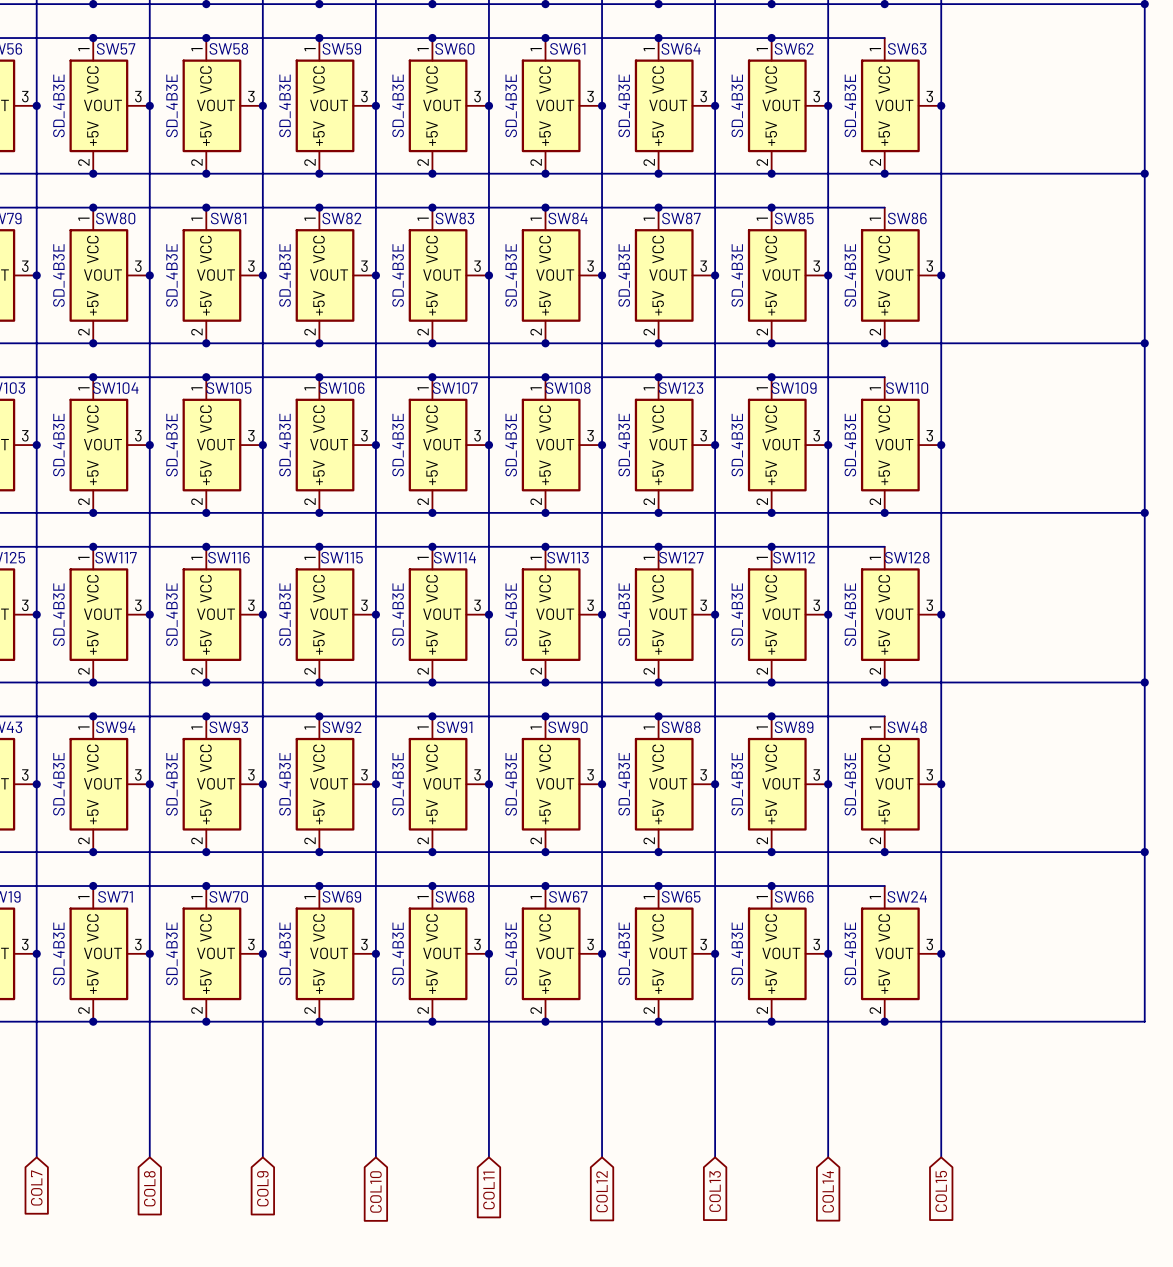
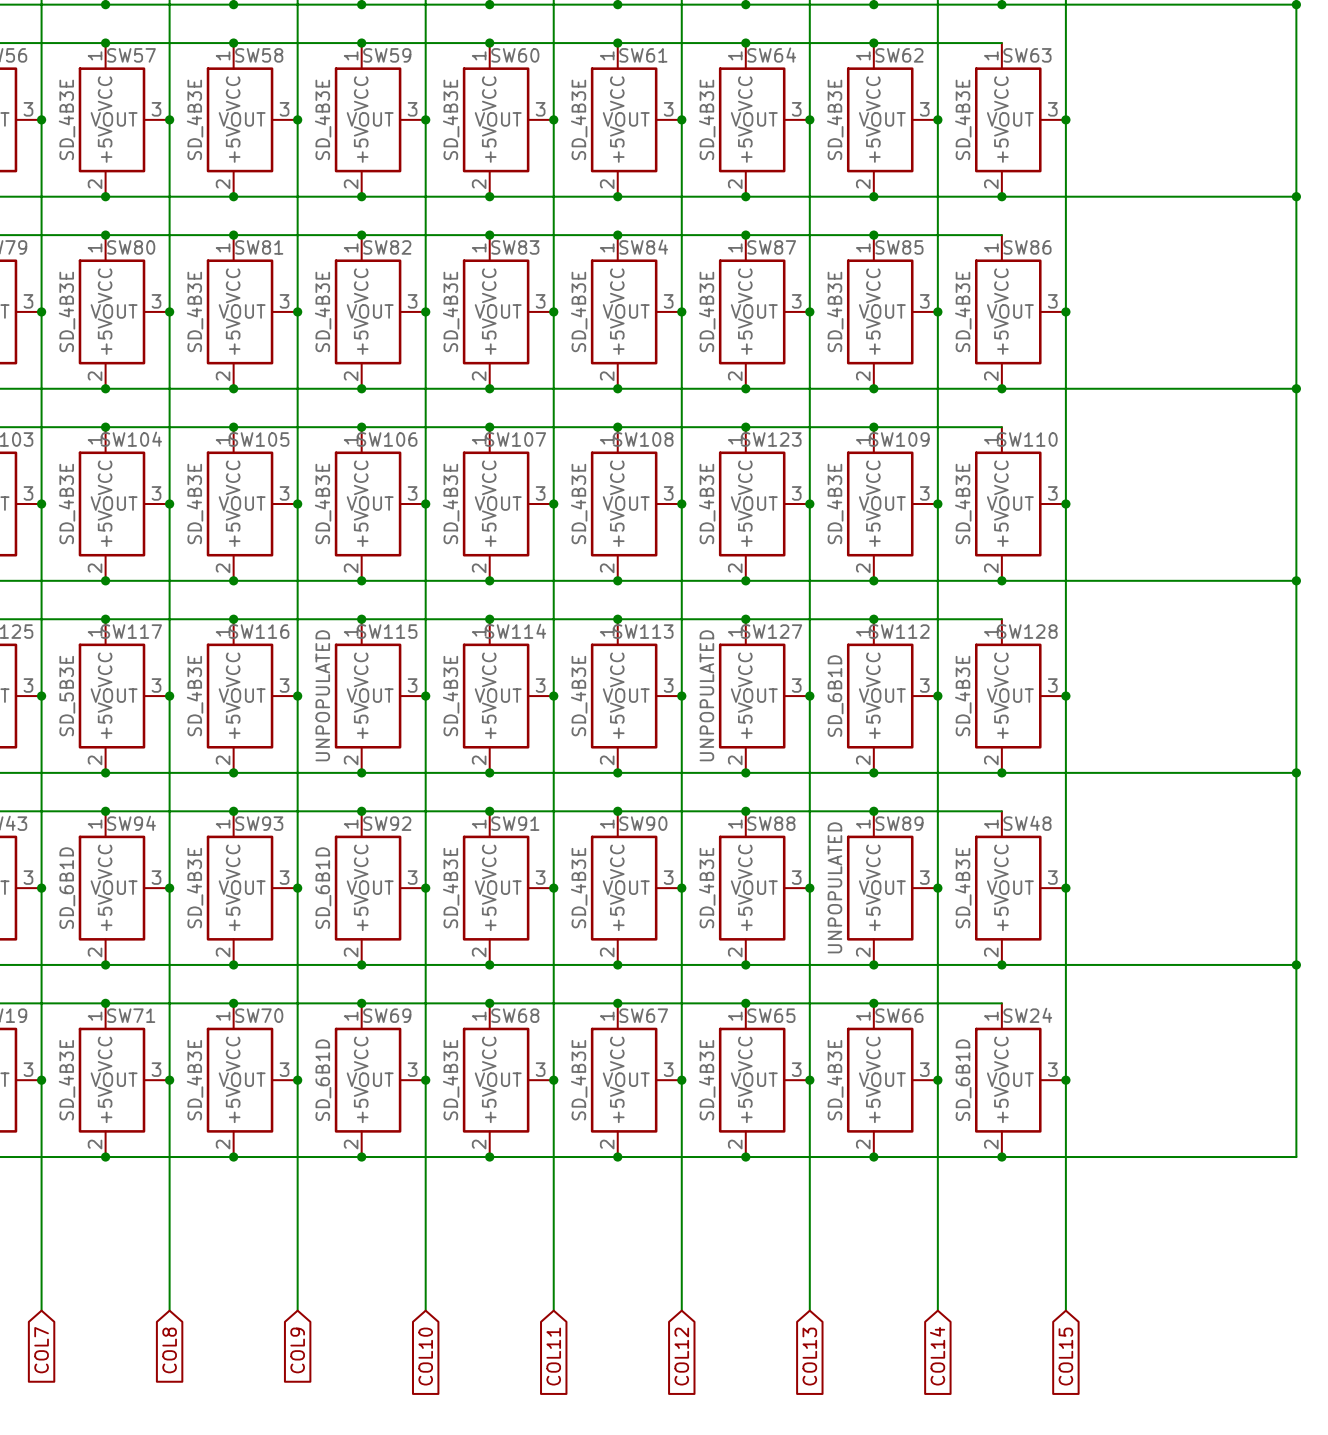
SW117 value: SD_4B3E (58, 614) -> SD_5B3E (67, 696)
SW115 value: SD_4B3E (285, 614) -> UNPOPULATED (322, 695)
SW127 value: SD_4B3E (624, 614) -> UNPOPULATED (706, 695)
SW112 value: SD_4B3E (737, 614) -> SD_6B1D (835, 696)
SW94 value: SD_4B3E (58, 784) -> SD_6B1D (67, 888)
SW92 value: SD_4B3E (285, 784) -> SD_6B1D (323, 888)
SW89 value: SD_4B3E (737, 784) -> UNPOPULATED (834, 887)
SW69 value: SD_4B3E (285, 953) -> SD_6B1D (323, 1080)
SW24 value: SD_4B3E (850, 953) -> SD_6B1D (963, 1080)

